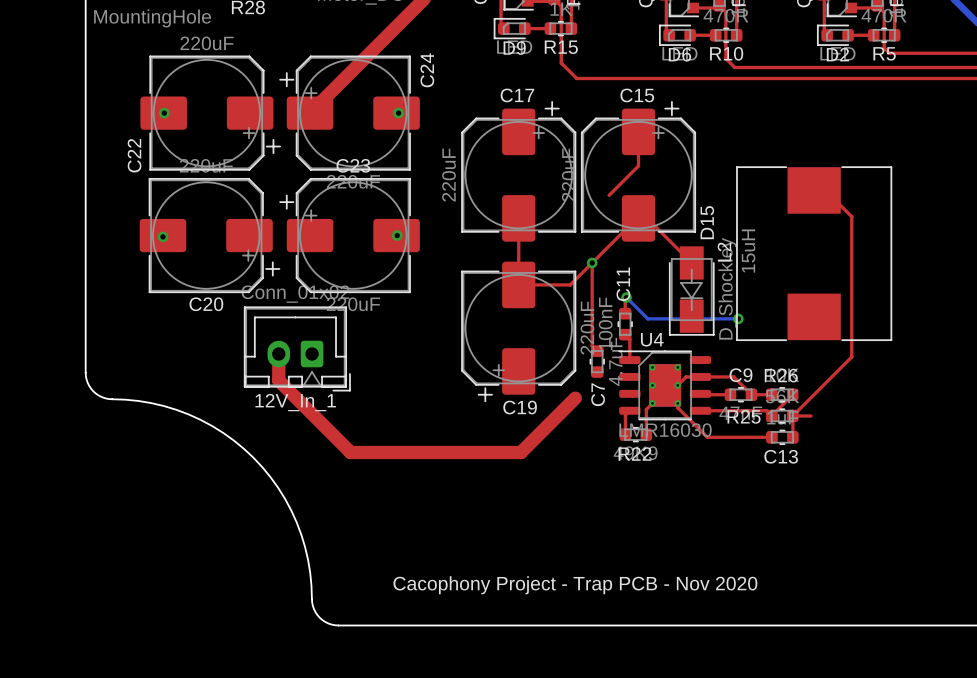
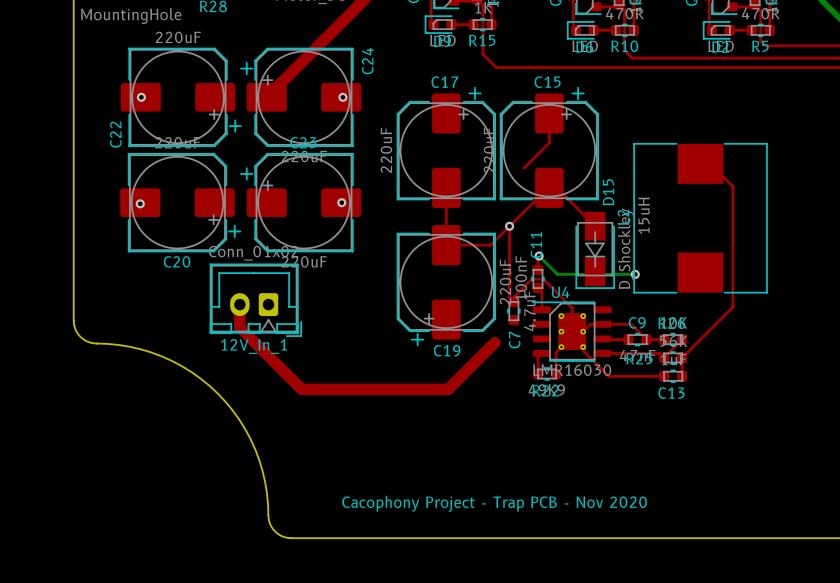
top track: none -> (513, 297) (531, 279) (543, 279) (572, 308) (572, 331)
top track: (792, 416) (810, 416) -> none

